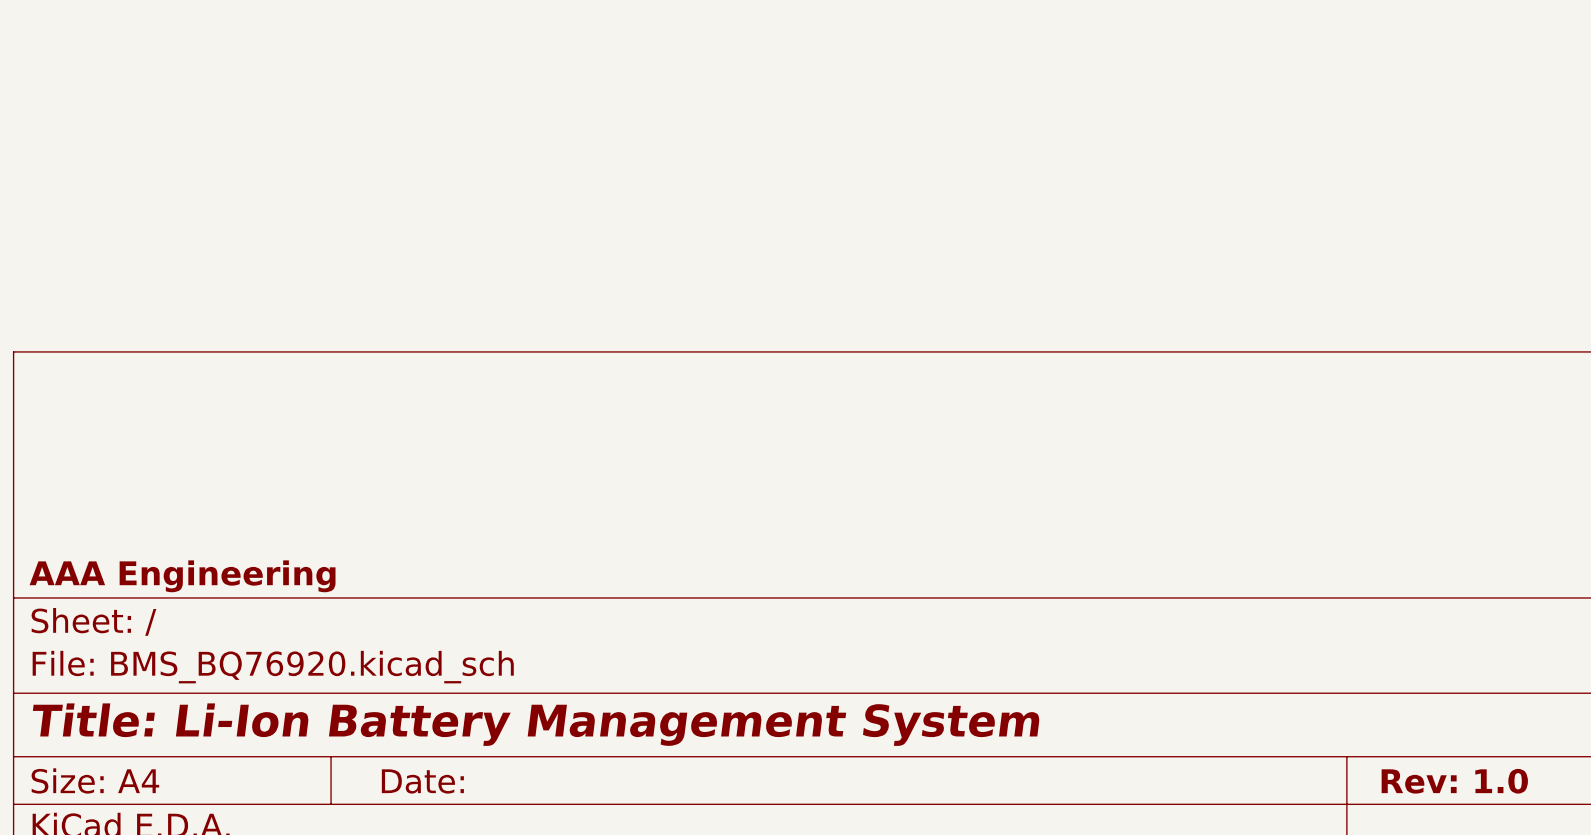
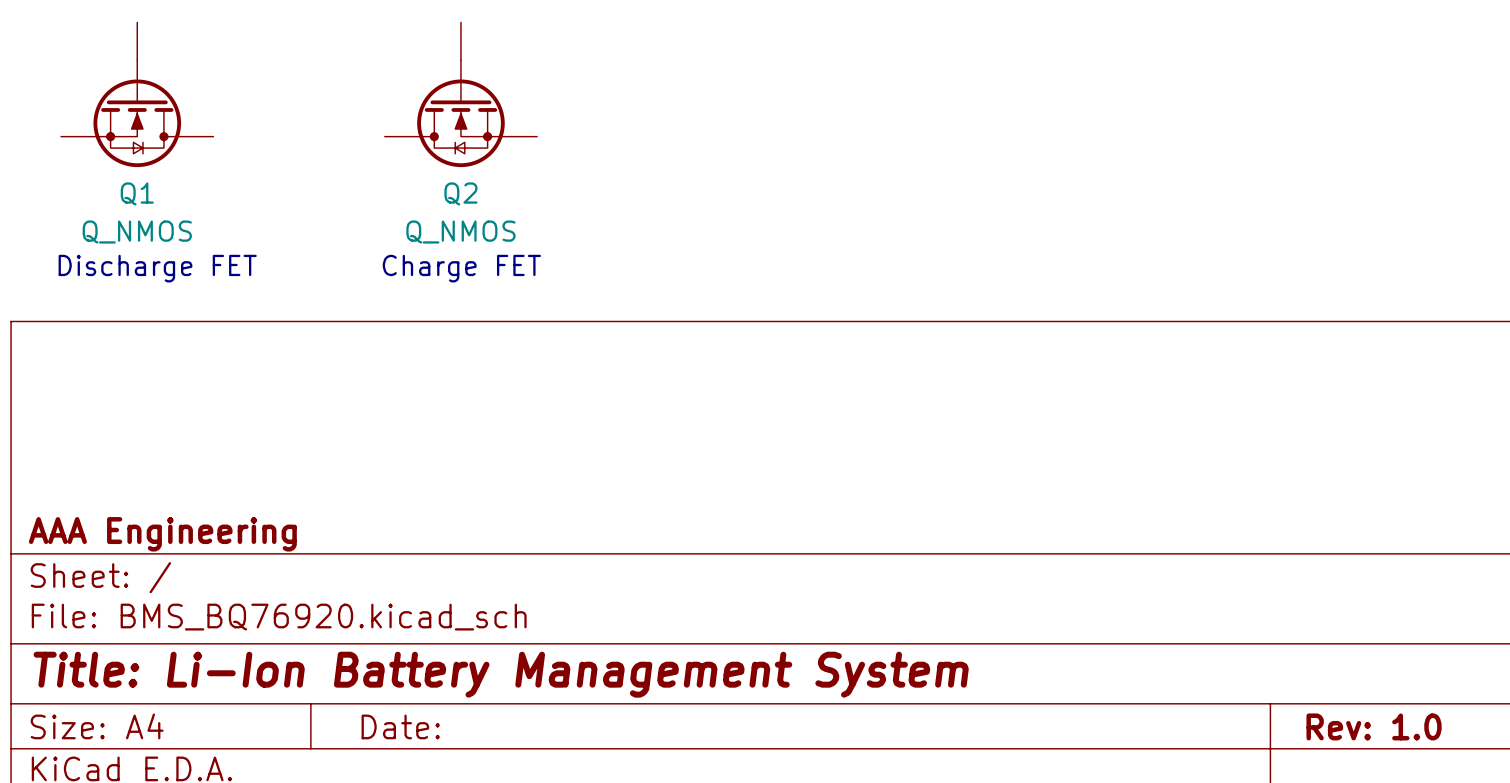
Q1: none -> Q_NMOS (137, 94)
Q2: none -> Q_NMOS (460, 94)
text: none -> Discharge FET (157, 268)
text: none -> Charge FET (461, 268)

